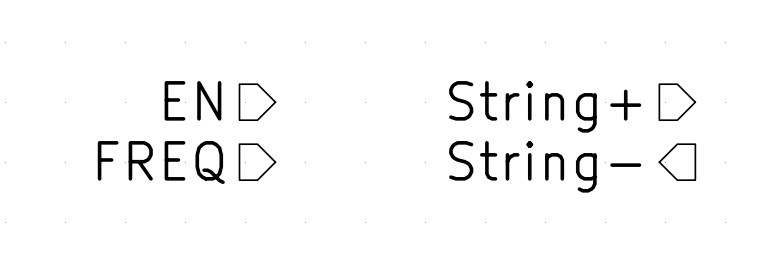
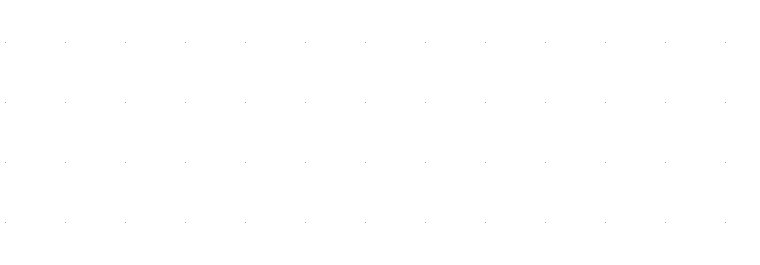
hierarchical label: EN (193, 100) -> none
hierarchical label: String+ (545, 106) -> none
hierarchical label: FREQ (161, 162) -> none
hierarchical label: String- (545, 166) -> none

